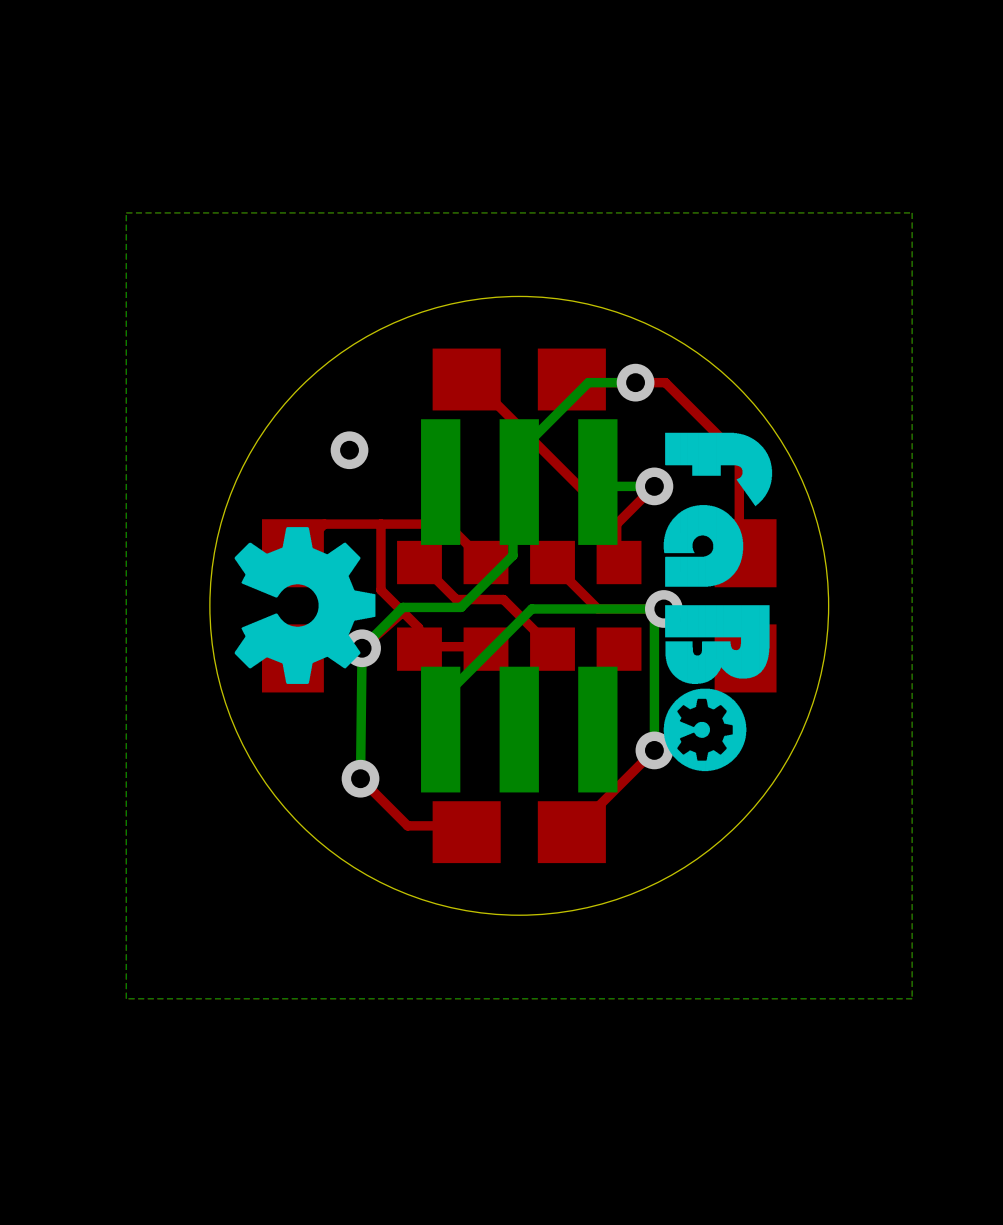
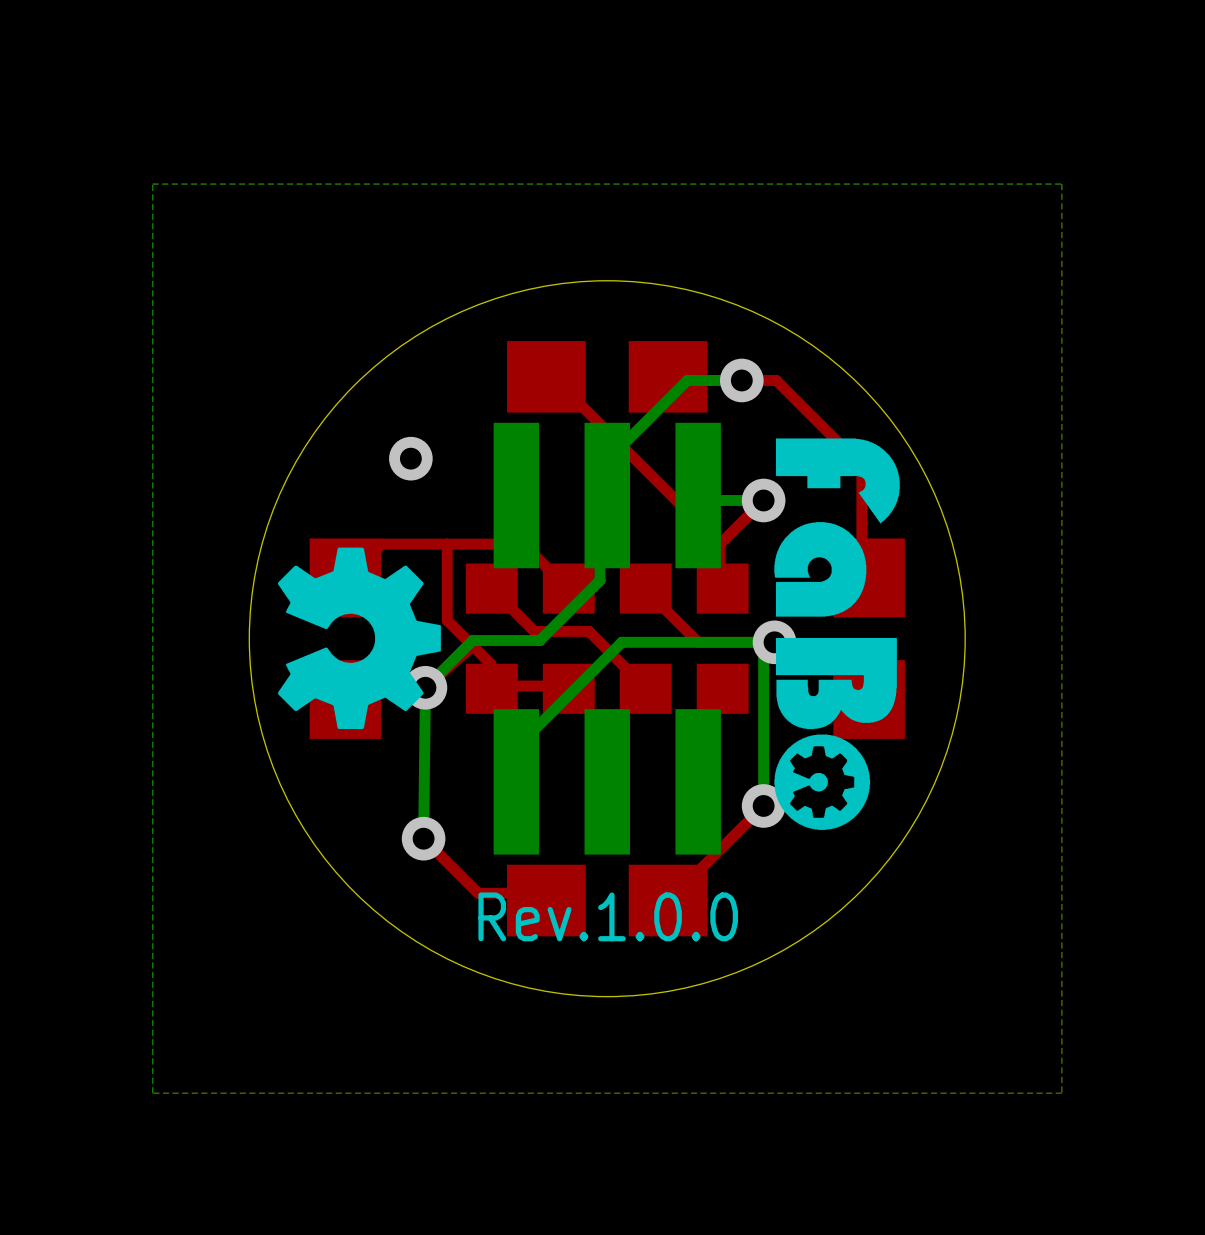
text: none -> Rev.1.0.0 (608, 916)

